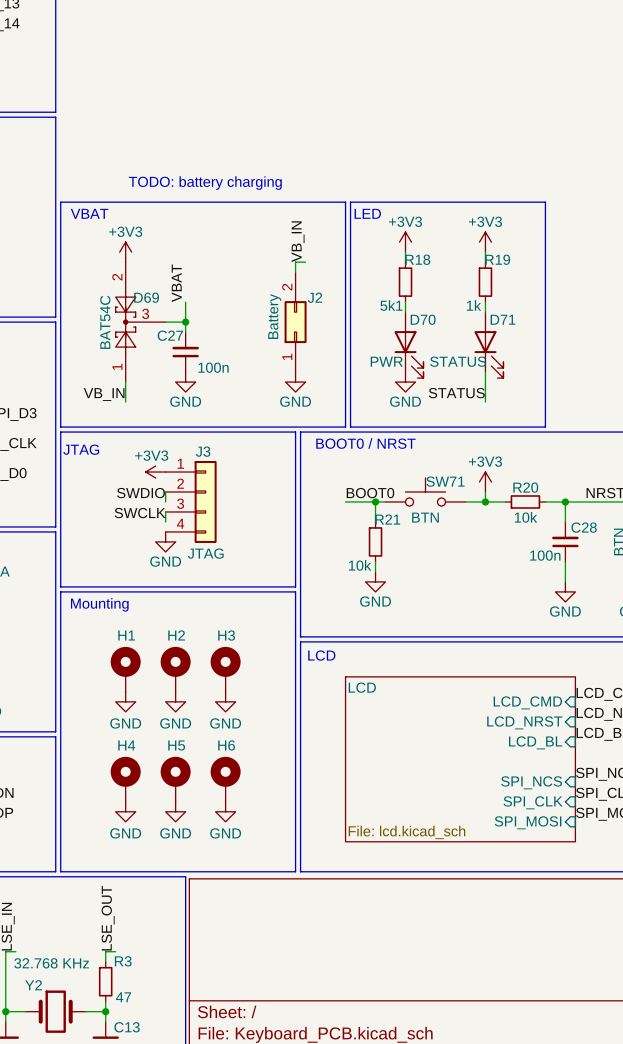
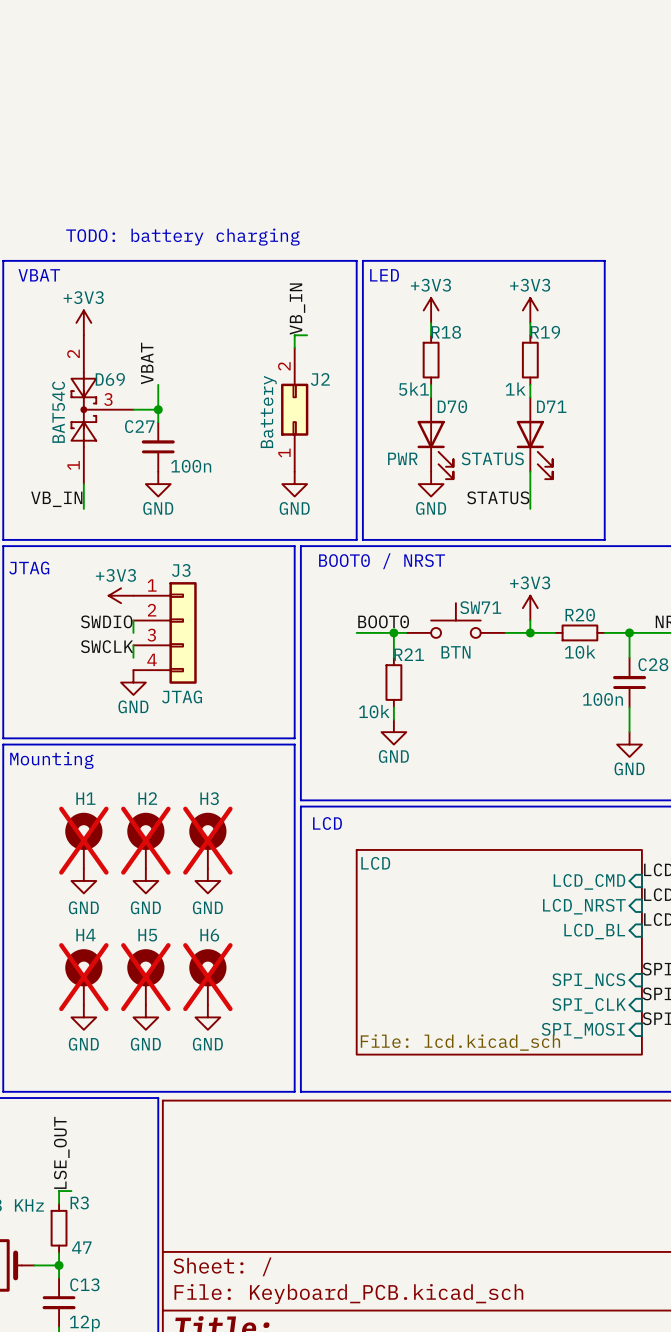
H1 do-not-place cross: none -> (83, 840)
H2 do-not-place cross: none -> (145, 840)
H3 do-not-place cross: none -> (207, 840)
H4 do-not-place cross: none -> (83, 977)
H5 do-not-place cross: none -> (145, 977)
H6 do-not-place cross: none -> (207, 977)

